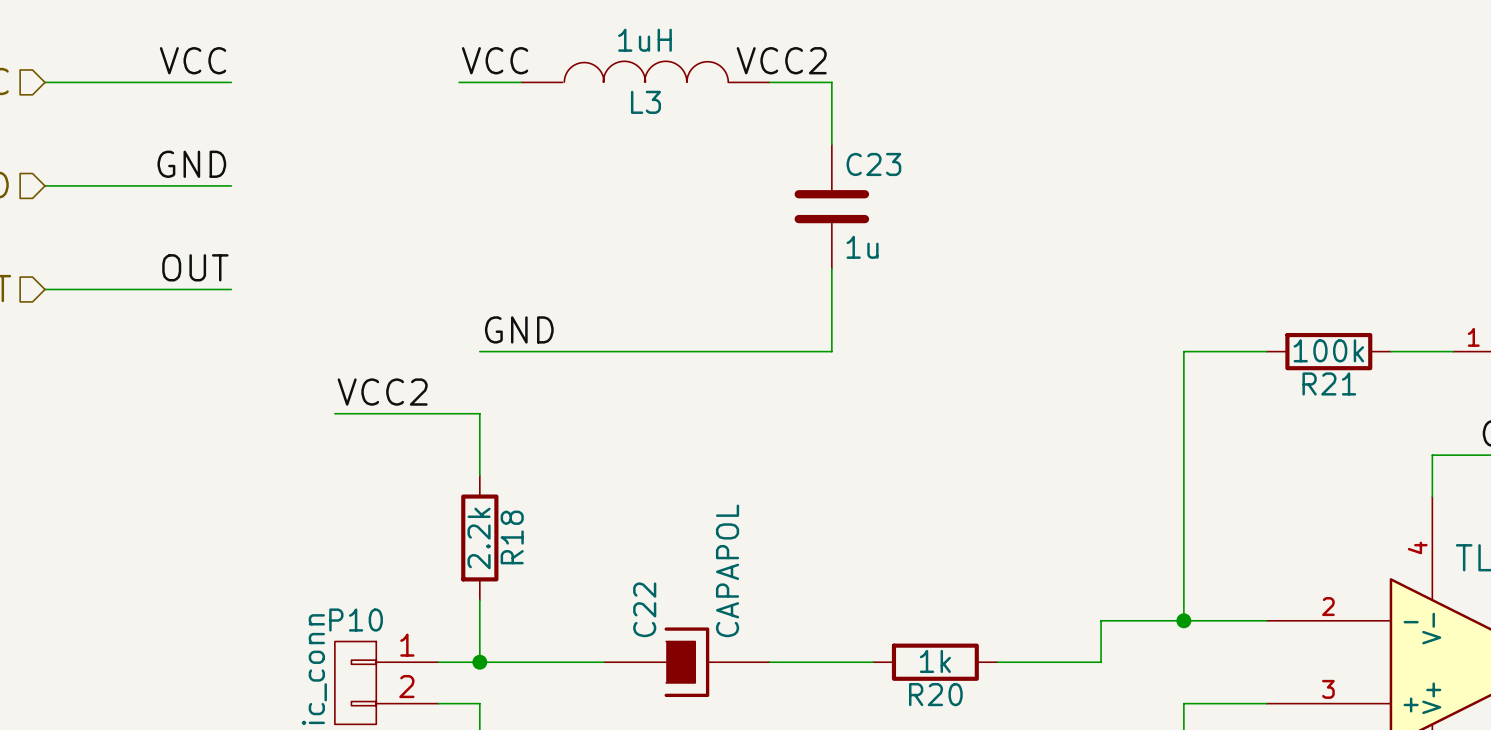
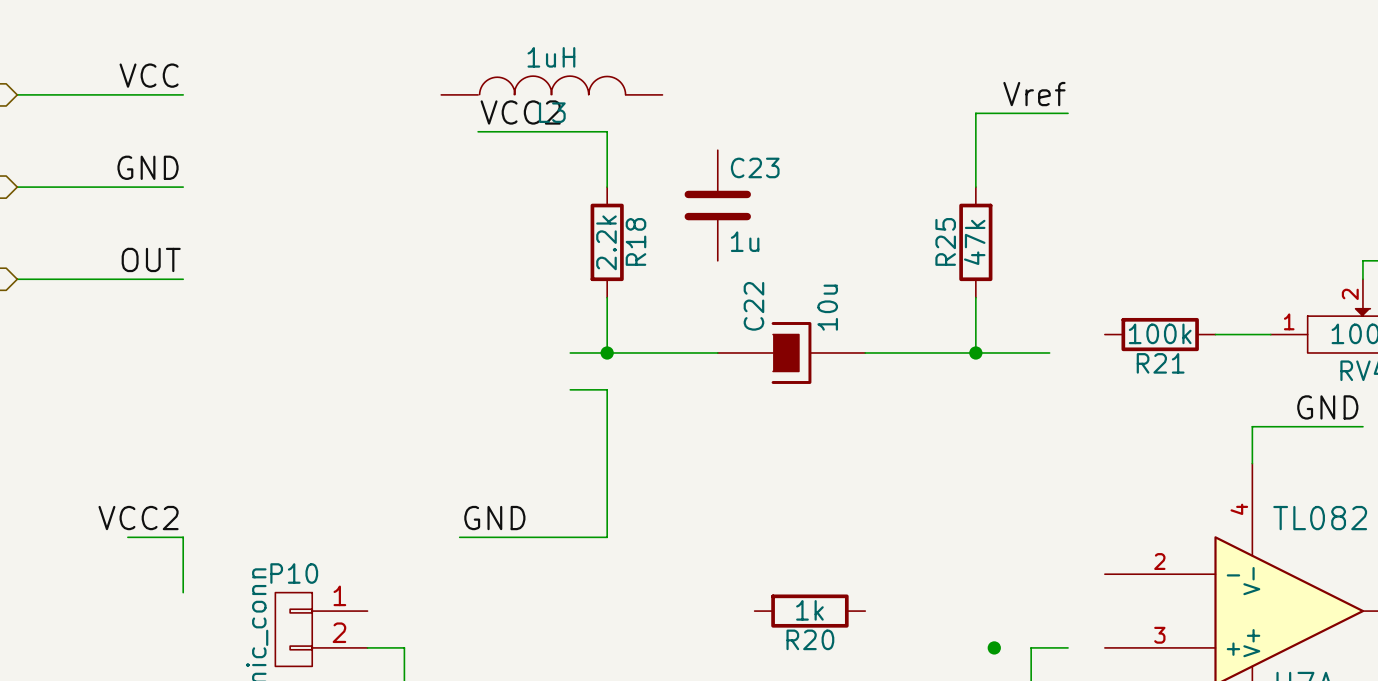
label: VCC (495, 60) -> none
label: VCC2 (781, 60) -> none
label: none -> Vref (1034, 94)
wire: (459, 82) (521, 82) -> none
wire: (769, 82) (831, 82) (831, 144) -> none
label: none -> VCC2 (520, 112)
wire: none -> (1068, 113) (975, 113) (975, 187)
R25: none -> 47k (975, 242)
wire: (831, 268) (831, 351) (479, 351) -> none
wire: none -> (975, 297) (975, 352)
label: GND (519, 329) -> none
wire: (1266, 351) (1183, 351) (1183, 620) -> none
junction: none -> (607, 352)
wire: none -> (865, 352) (1049, 352)
junction: none -> (975, 352)
label: VCC2 (382, 392) -> none
wire: (334, 413) (479, 413) (479, 475) -> (478, 131) (607, 131) (607, 187)
wire: none -> (570, 389) (607, 389) (607, 537) (459, 537)
R18 position: (479, 537) -> (607, 242)
label: none -> VCC2 (138, 518)
label: none -> GND (494, 518)
C22 value: CAPAPOL (727, 570) -> 10u (827, 307)
wire: none -> (127, 537) (183, 537) (183, 592)
wire: (479, 600) (479, 662) -> (607, 297) (607, 352)
junction position: (1183, 620) -> (994, 647)
wire: (1266, 620) (1101, 620) (1101, 662) (997, 662) -> none
wire: (438, 662) (604, 662) -> (570, 352) (717, 352)
junction: (479, 662) -> none
C22 position: (686, 662) -> (791, 352)
wire: (769, 662) (873, 662) -> none
wire: (1225, 703) (1266, 703) -> none

